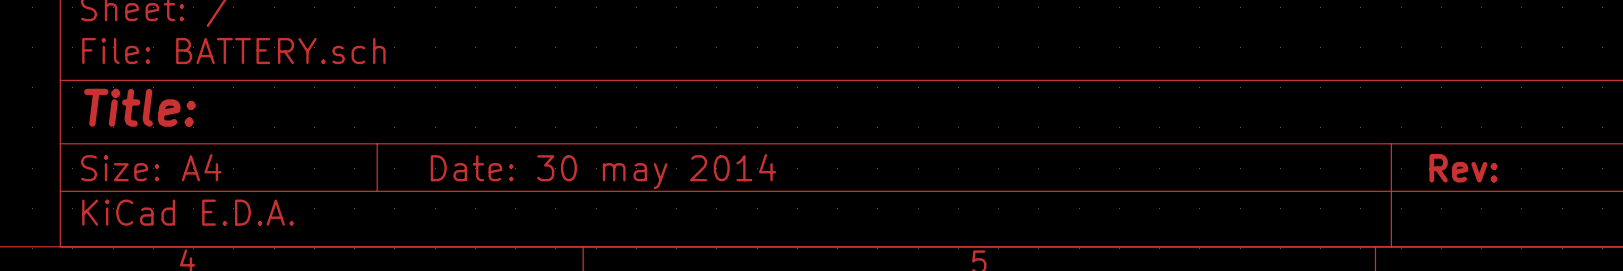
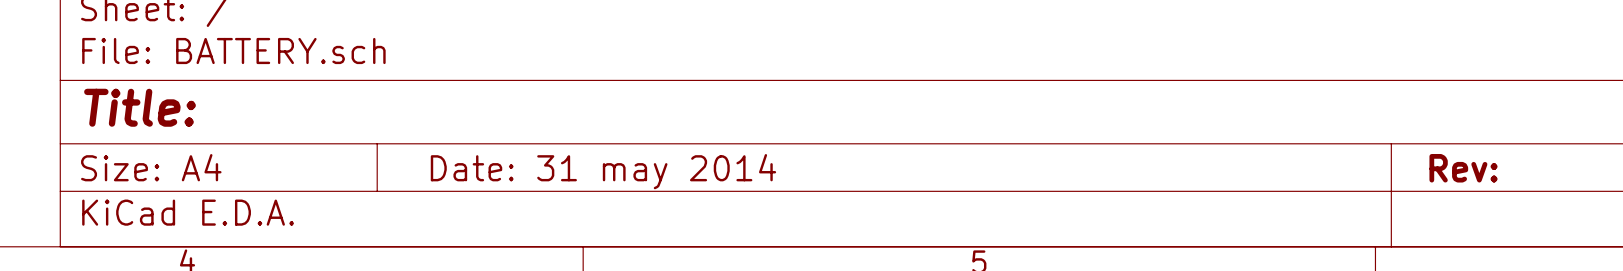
title block: Date: 30 may 2014 (603, 171) -> Date: 31 may 2014 (603, 171)

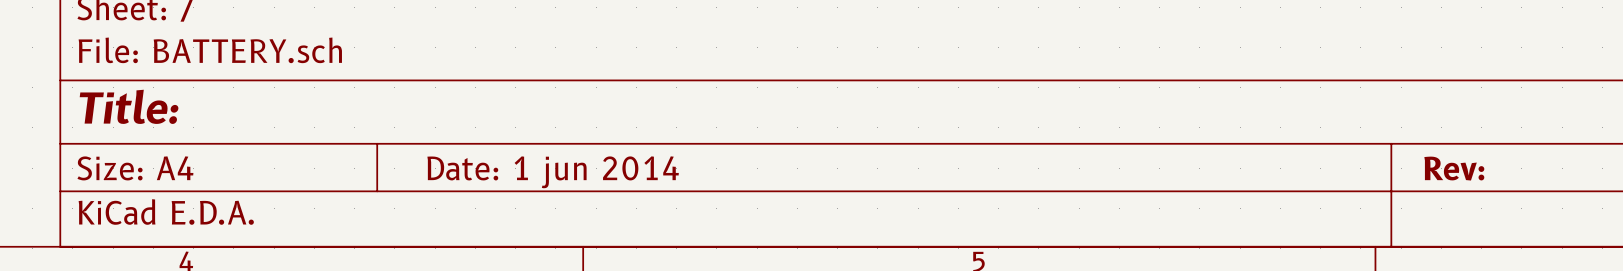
title block: Date: 31 may 2014 (603, 171) -> Date: 1 jun 2014 (553, 172)

